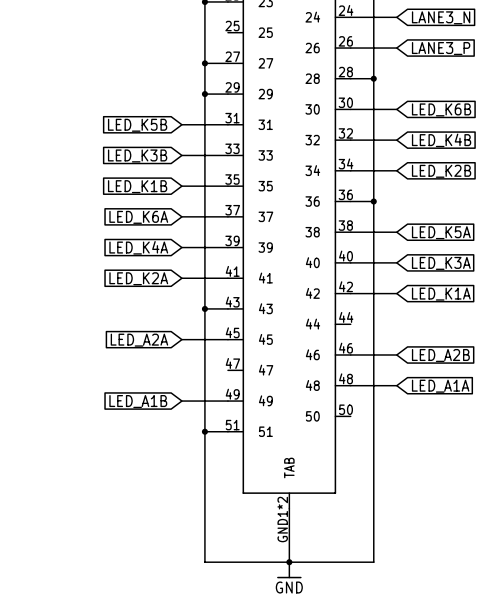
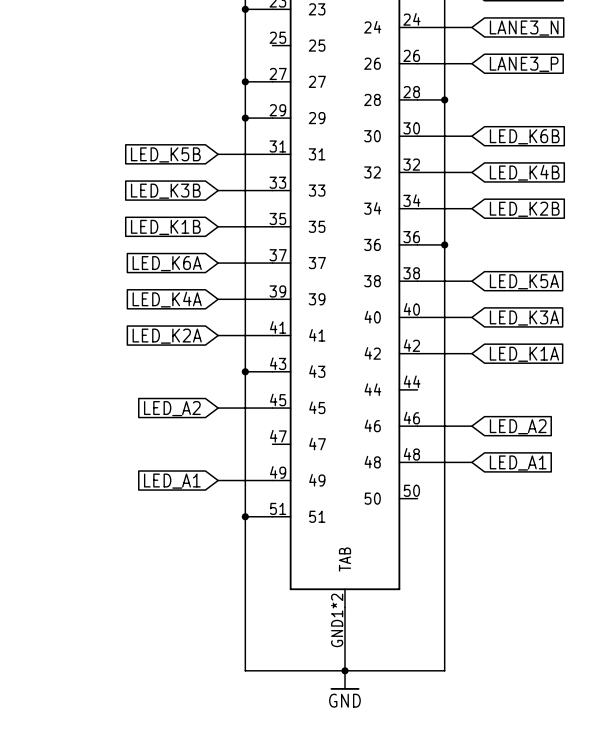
global label: LED_A2A (139, 340) -> LED_A2 (172, 408)
global label: LED_A2B (440, 355) -> LED_A2 (518, 426)
global label: LED_A1A (440, 386) -> LED_A1 (518, 463)
global label: LED_A1B (138, 401) -> LED_A1 (172, 481)

